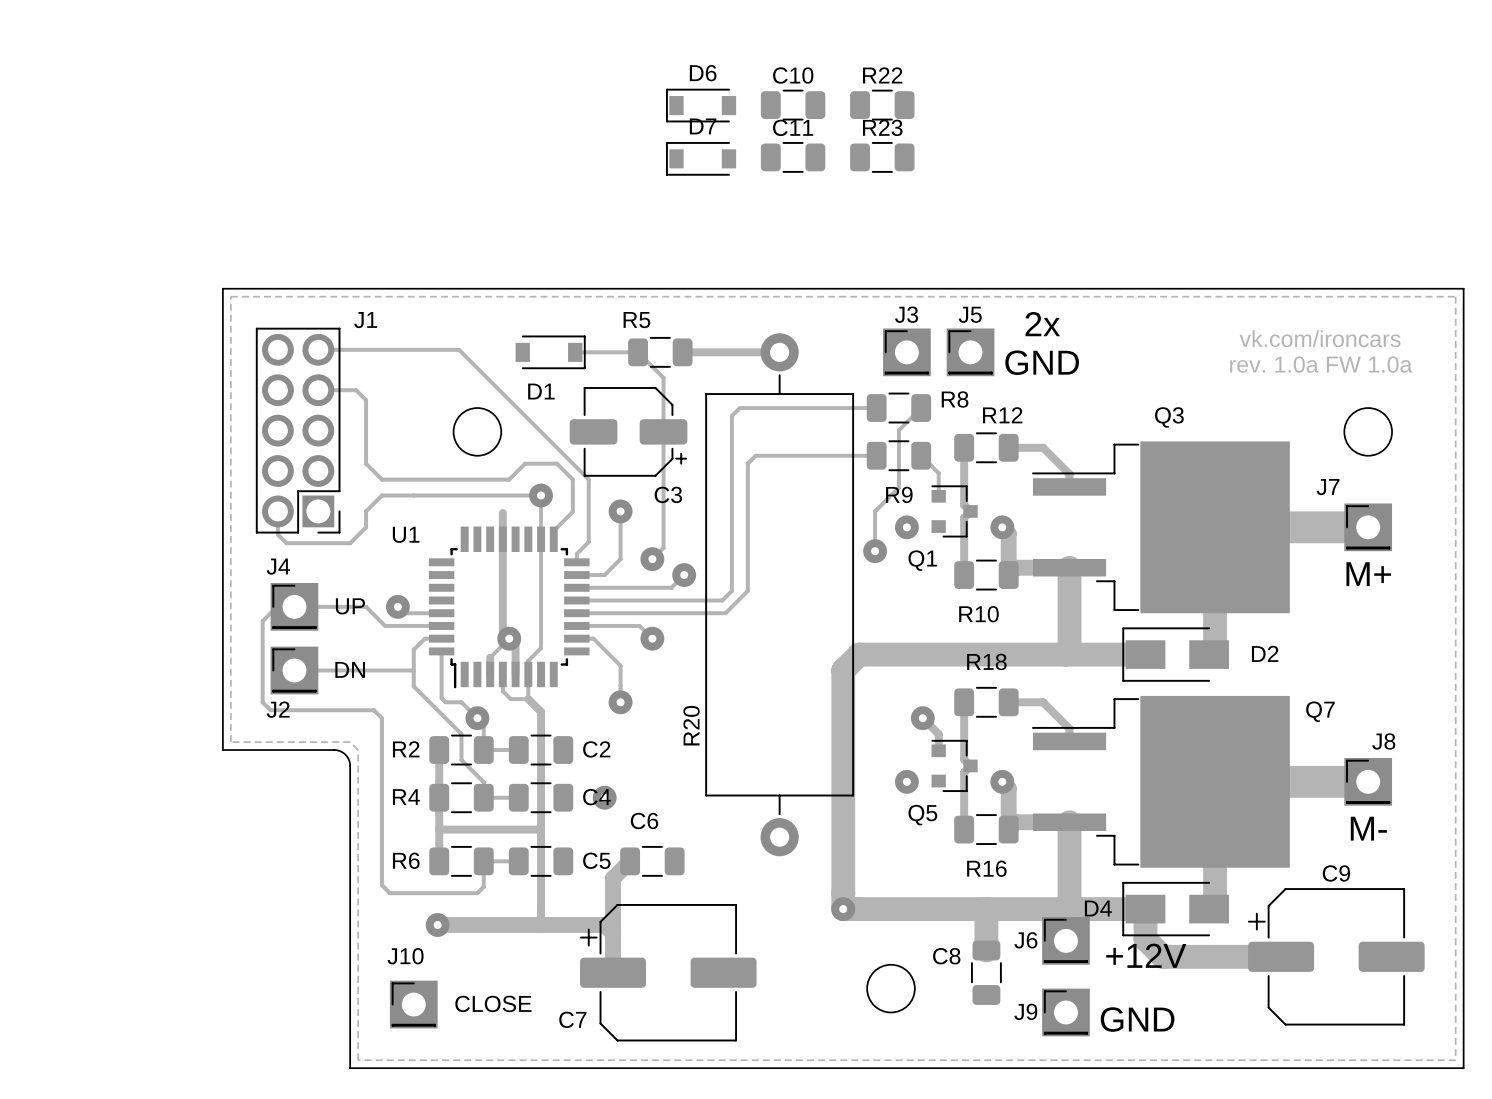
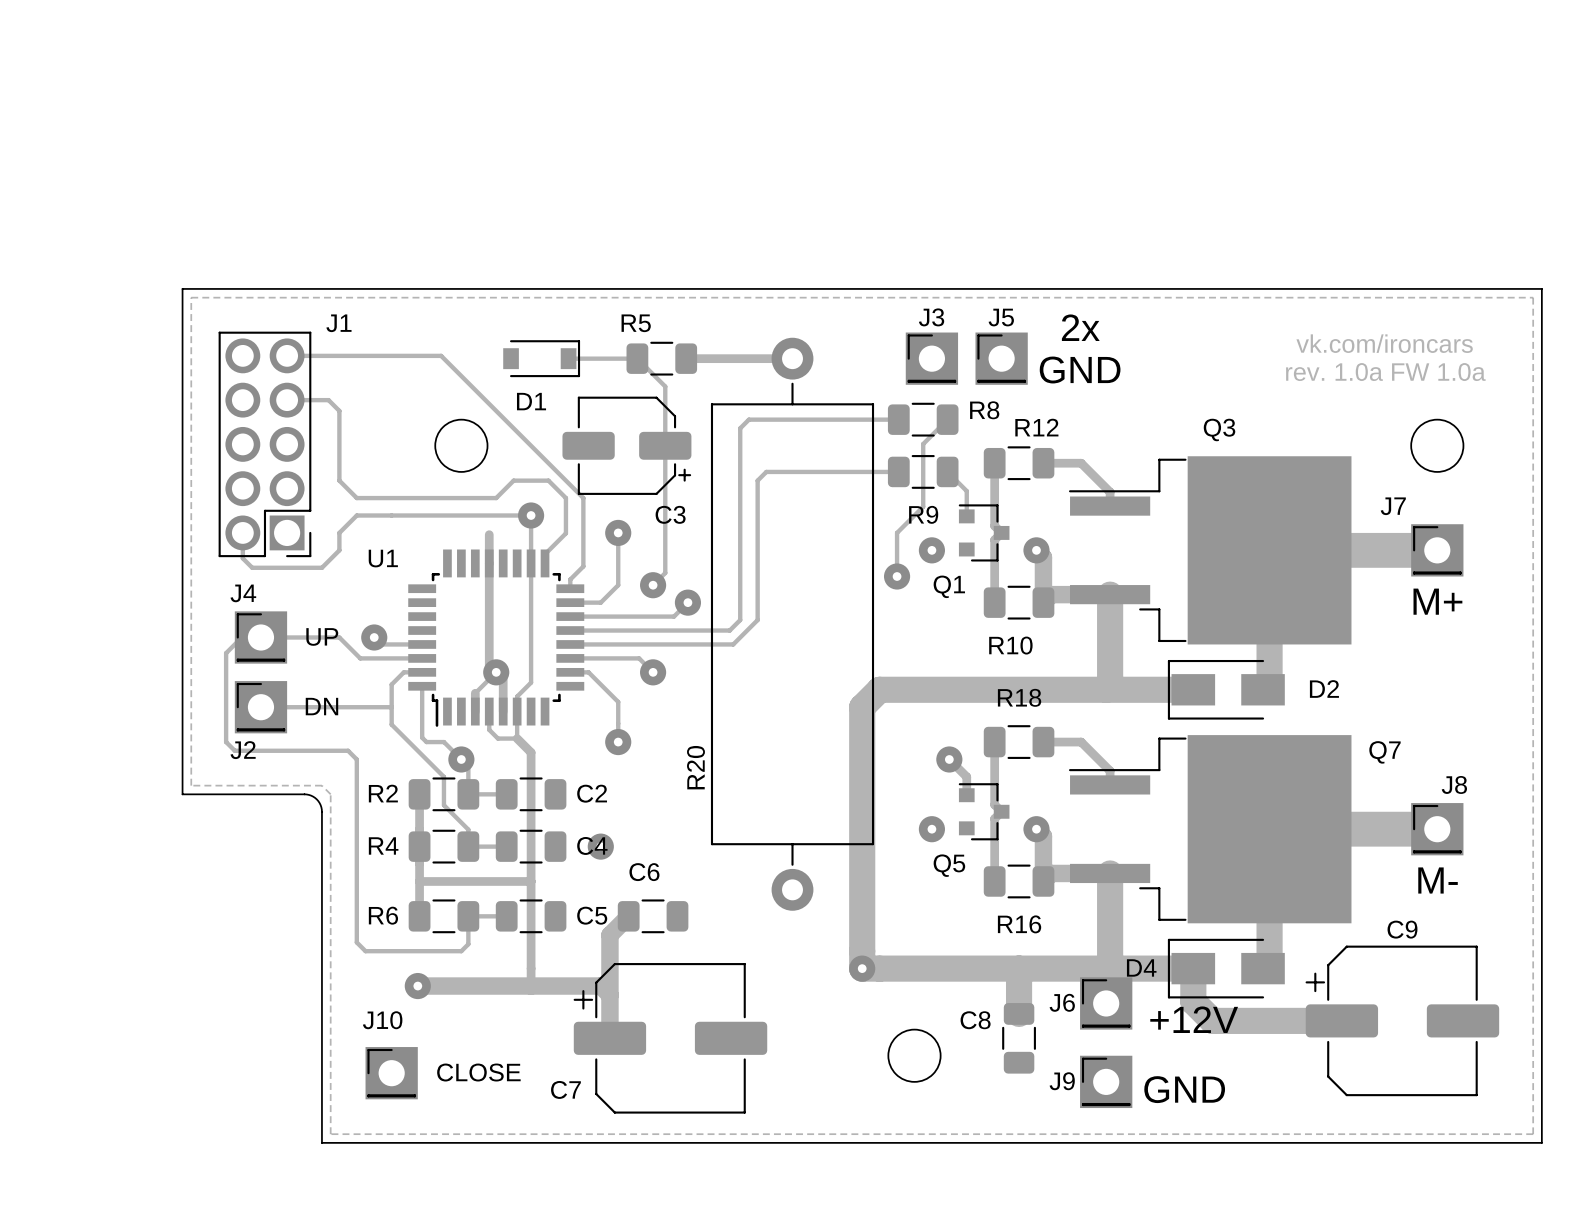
D6: (701, 105) -> none
C10: (793, 105) -> none
R22: (882, 105) -> none
C11: (793, 157) -> none
R23: (882, 157) -> none
D7: (701, 158) -> none

